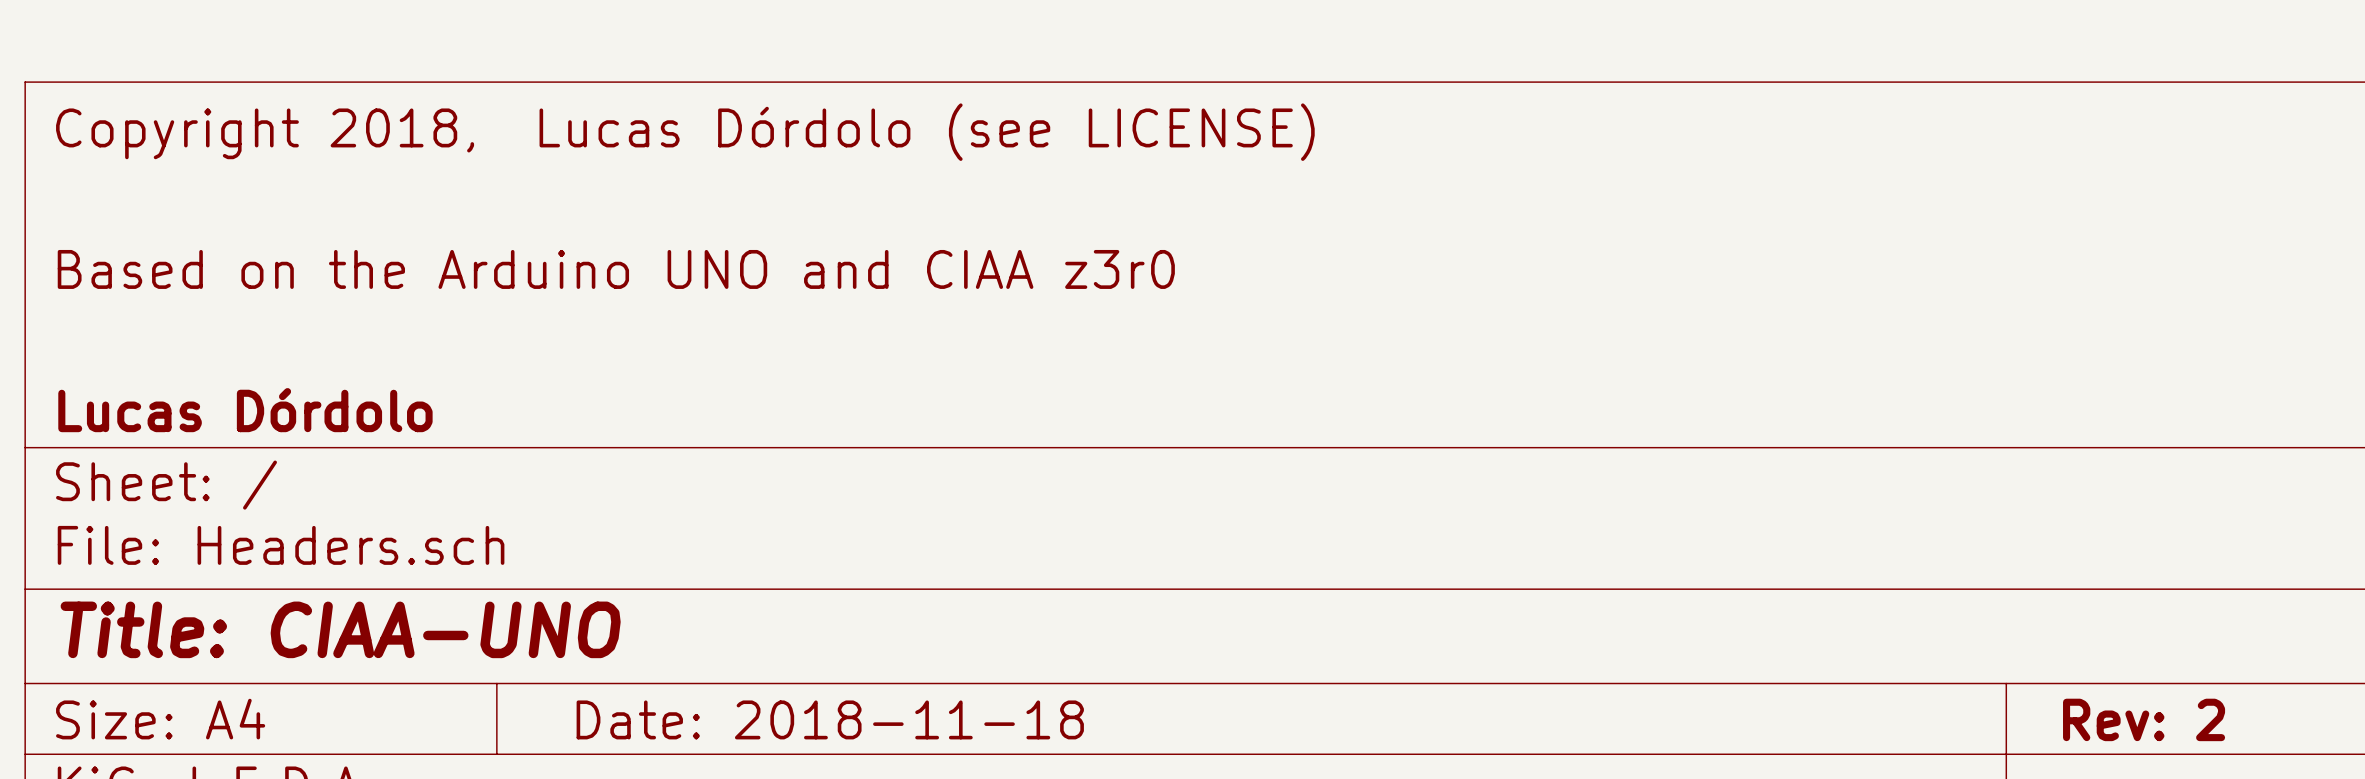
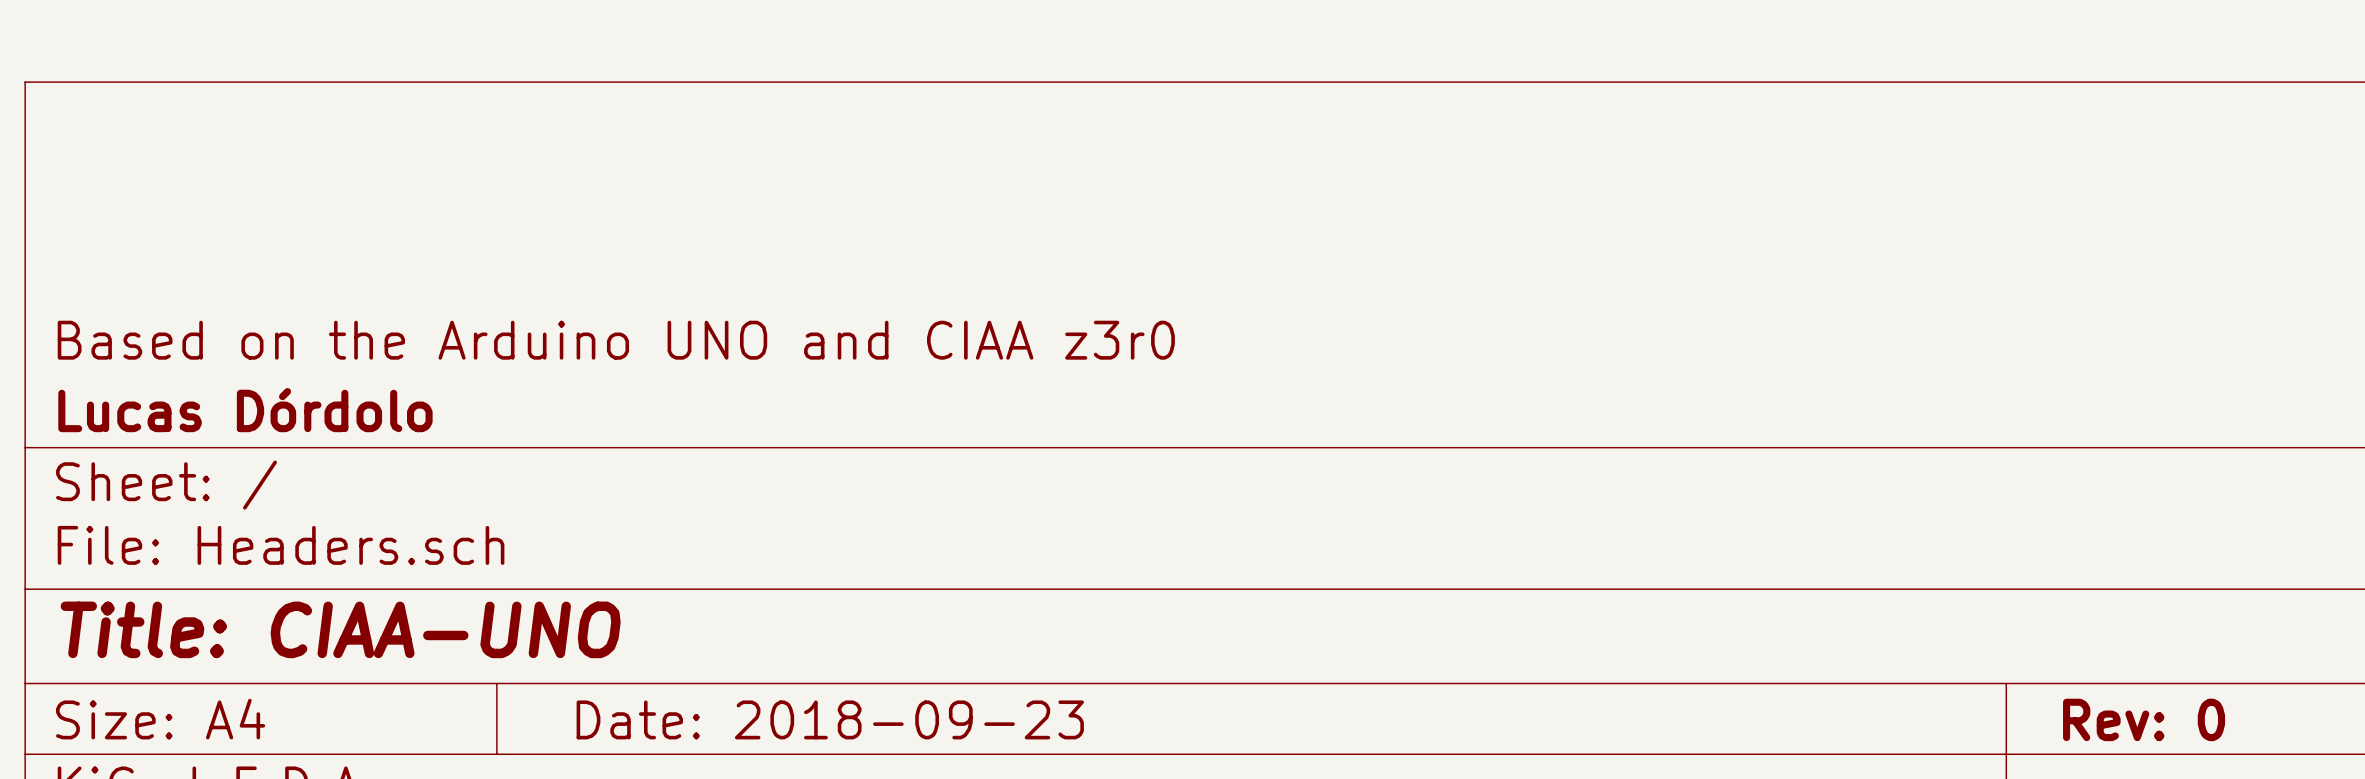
title block: Copyright 2018, Lucas Dórdolo (see LICENSE) (685, 132) -> none
title block position: Based on the Arduino UNO and CIAA z3r0 (616, 269) -> Based on the Arduino UNO and CIAA z3r0 (616, 340)
title block: Date: 2018-11-18 (830, 719) -> Date: 2018-09-23 (830, 719)
title block: Rev: 2 (2144, 719) -> Rev: 0 (2144, 719)

